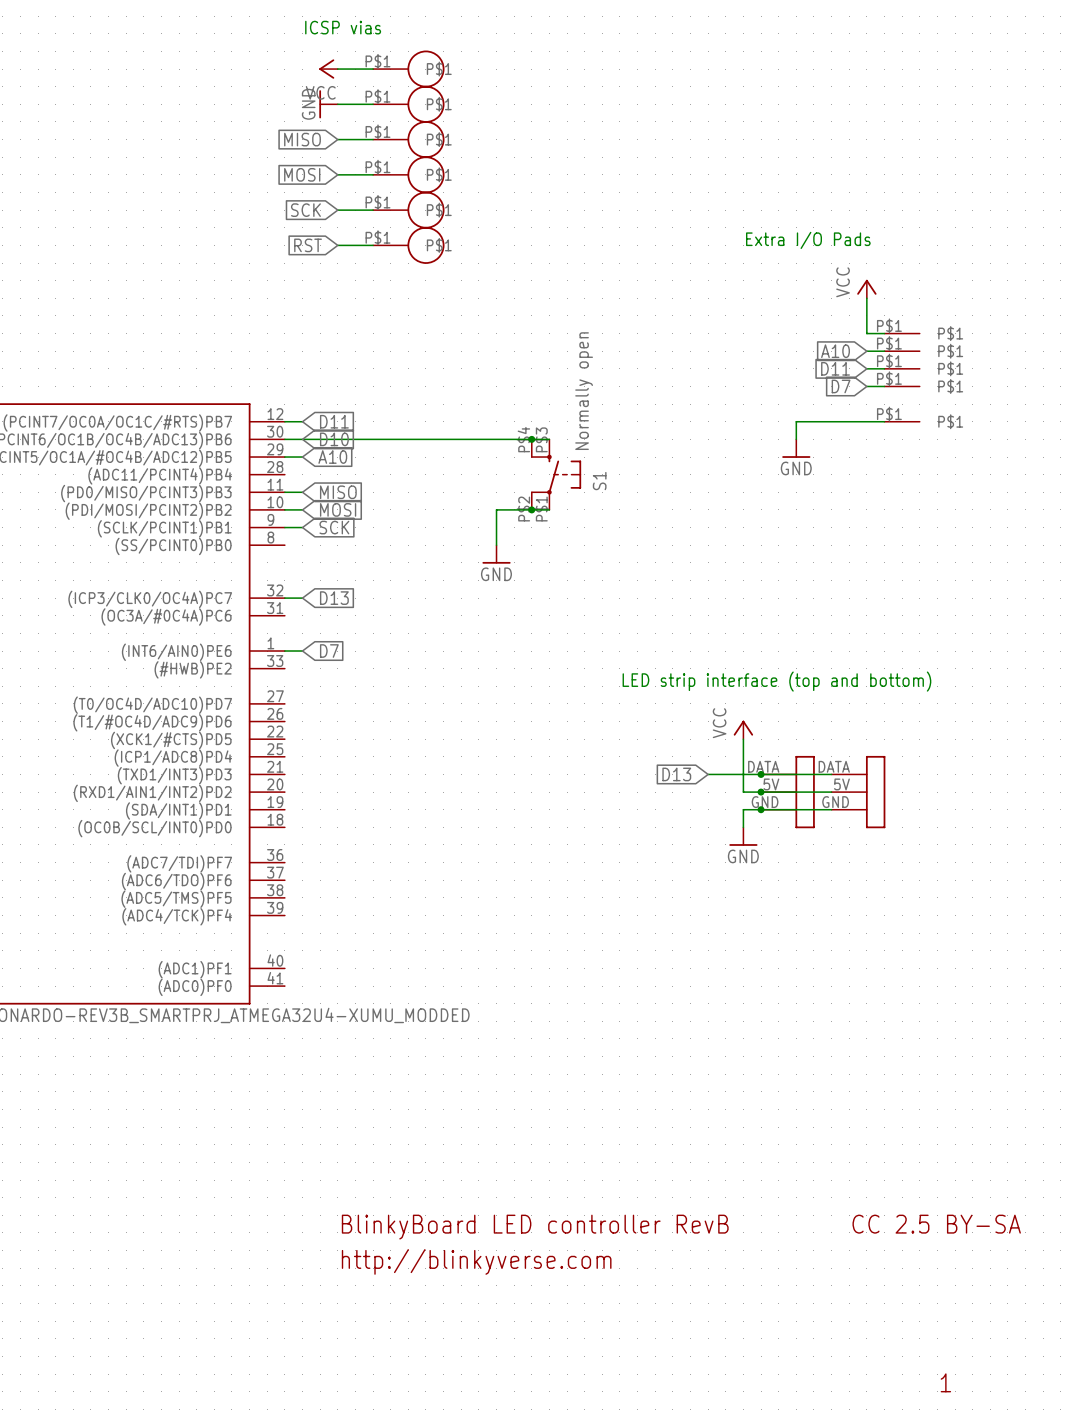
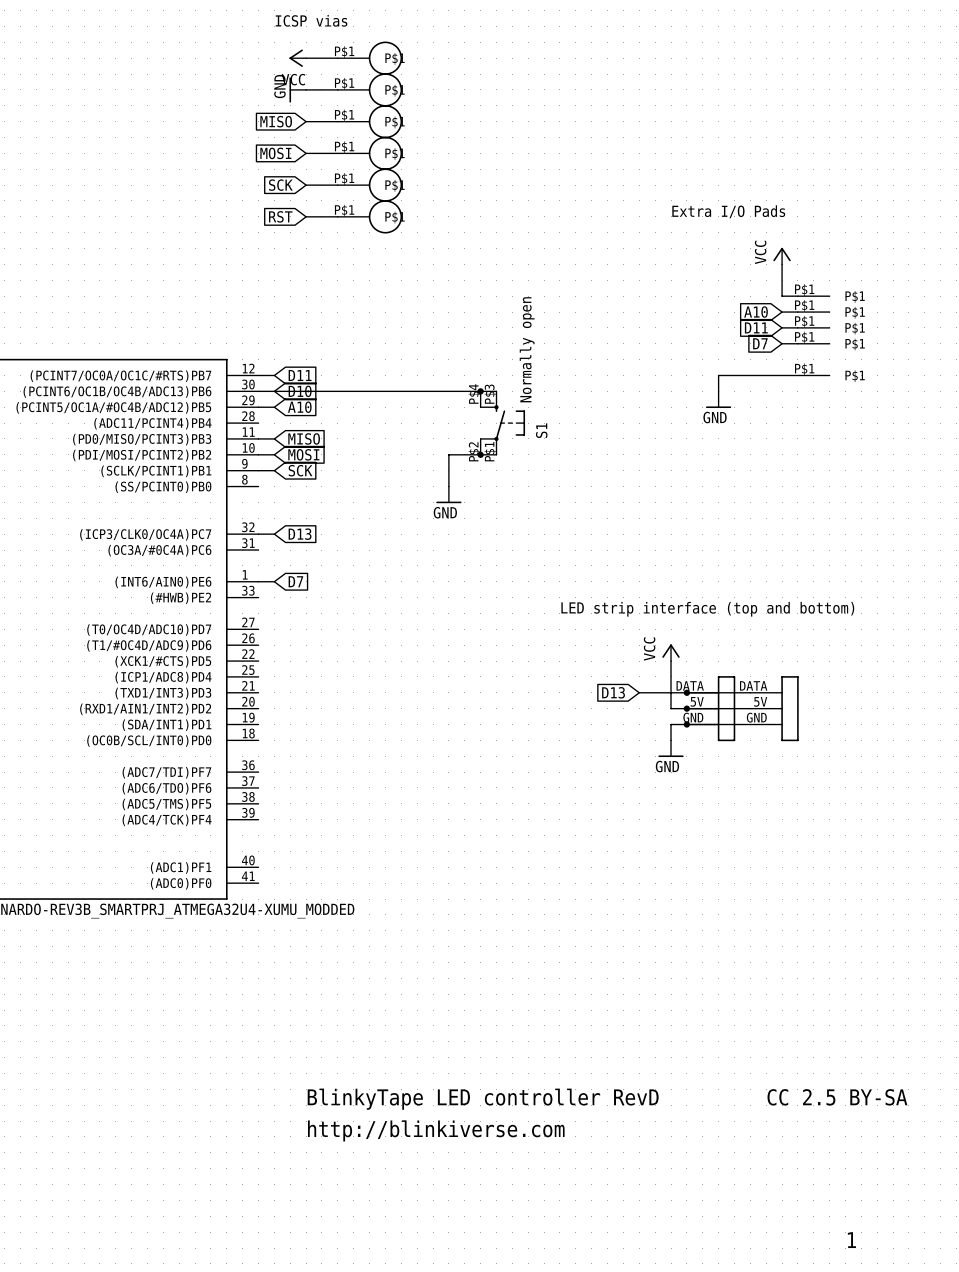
text: BlinkyBoard LED controller RevB (535, 1227) -> BlinkyTape LED controller RevD (483, 1099)
text: http://blinkyverse.com (476, 1261) -> http://blinkiverse.com (436, 1130)

